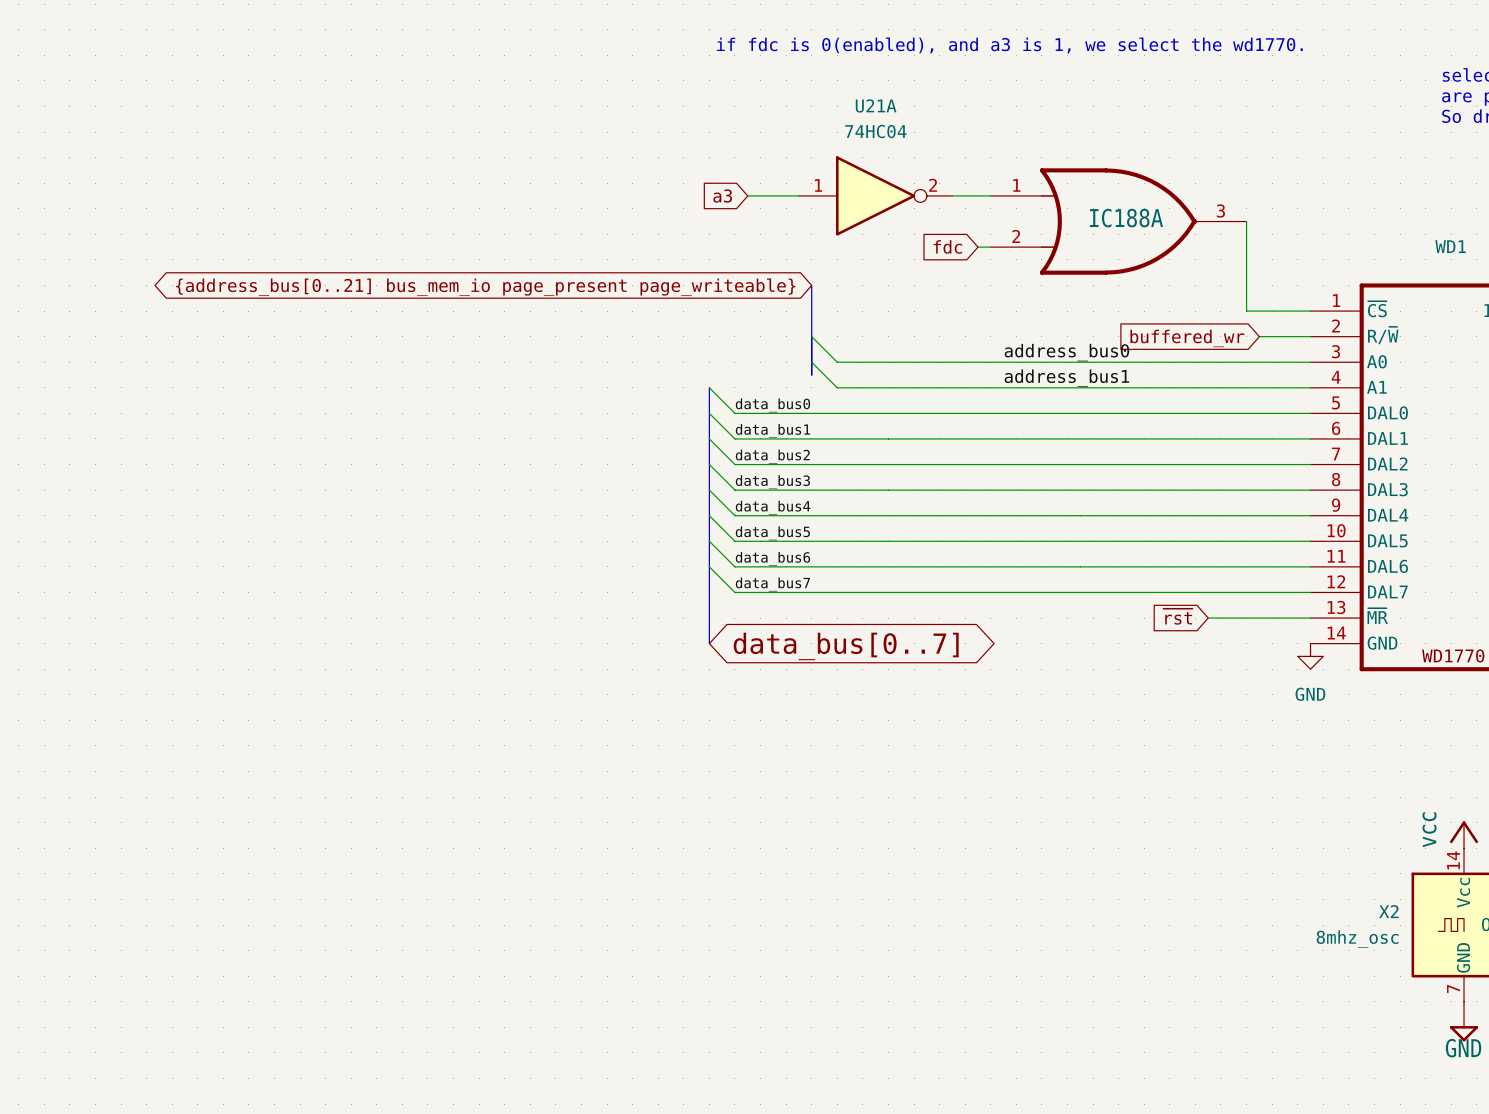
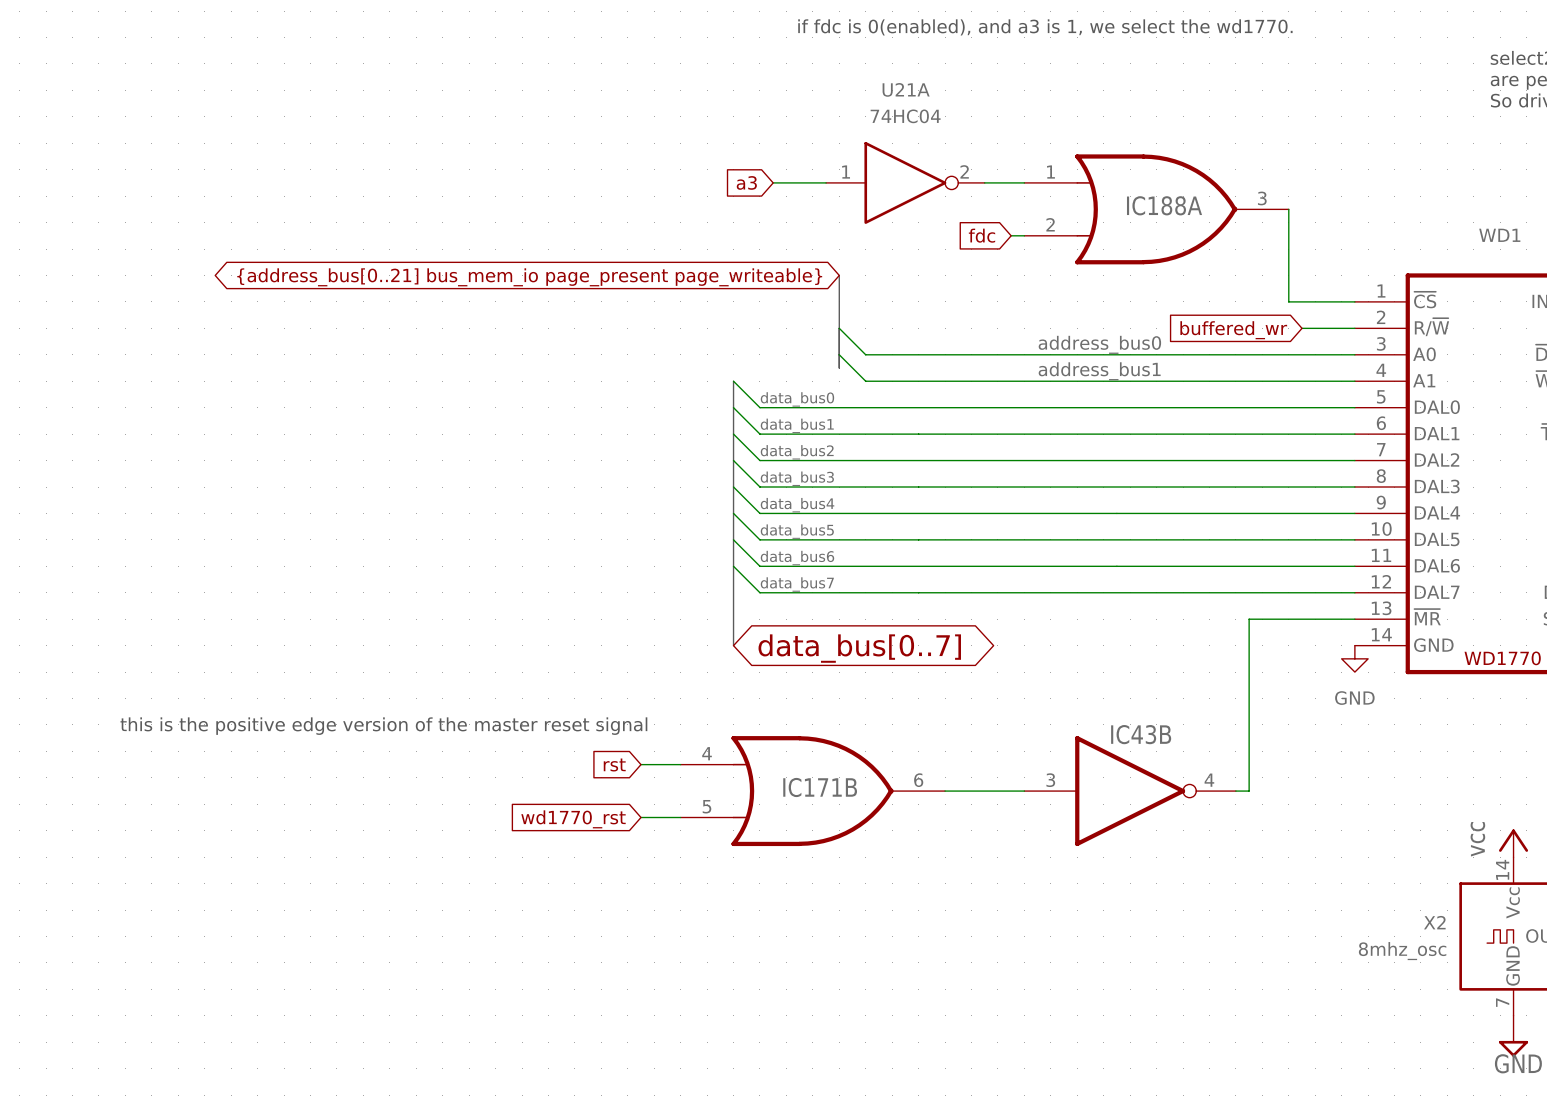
global label: ~{rst} (1177, 616) -> none
wire: none -> (1249, 619) (1249, 791) (1235, 791)
text: none -> this is the positive edge version of the master reset signal (383, 726)
wire: none -> (640, 764) (680, 764)
global label: none -> rst (614, 764)
IC171B: none -> (812, 791)
wire: none -> (945, 791) (1024, 791)
IC43B: none -> (1130, 791)
wire: none -> (640, 817) (680, 817)
global label: none -> wd1770_rst (573, 819)

